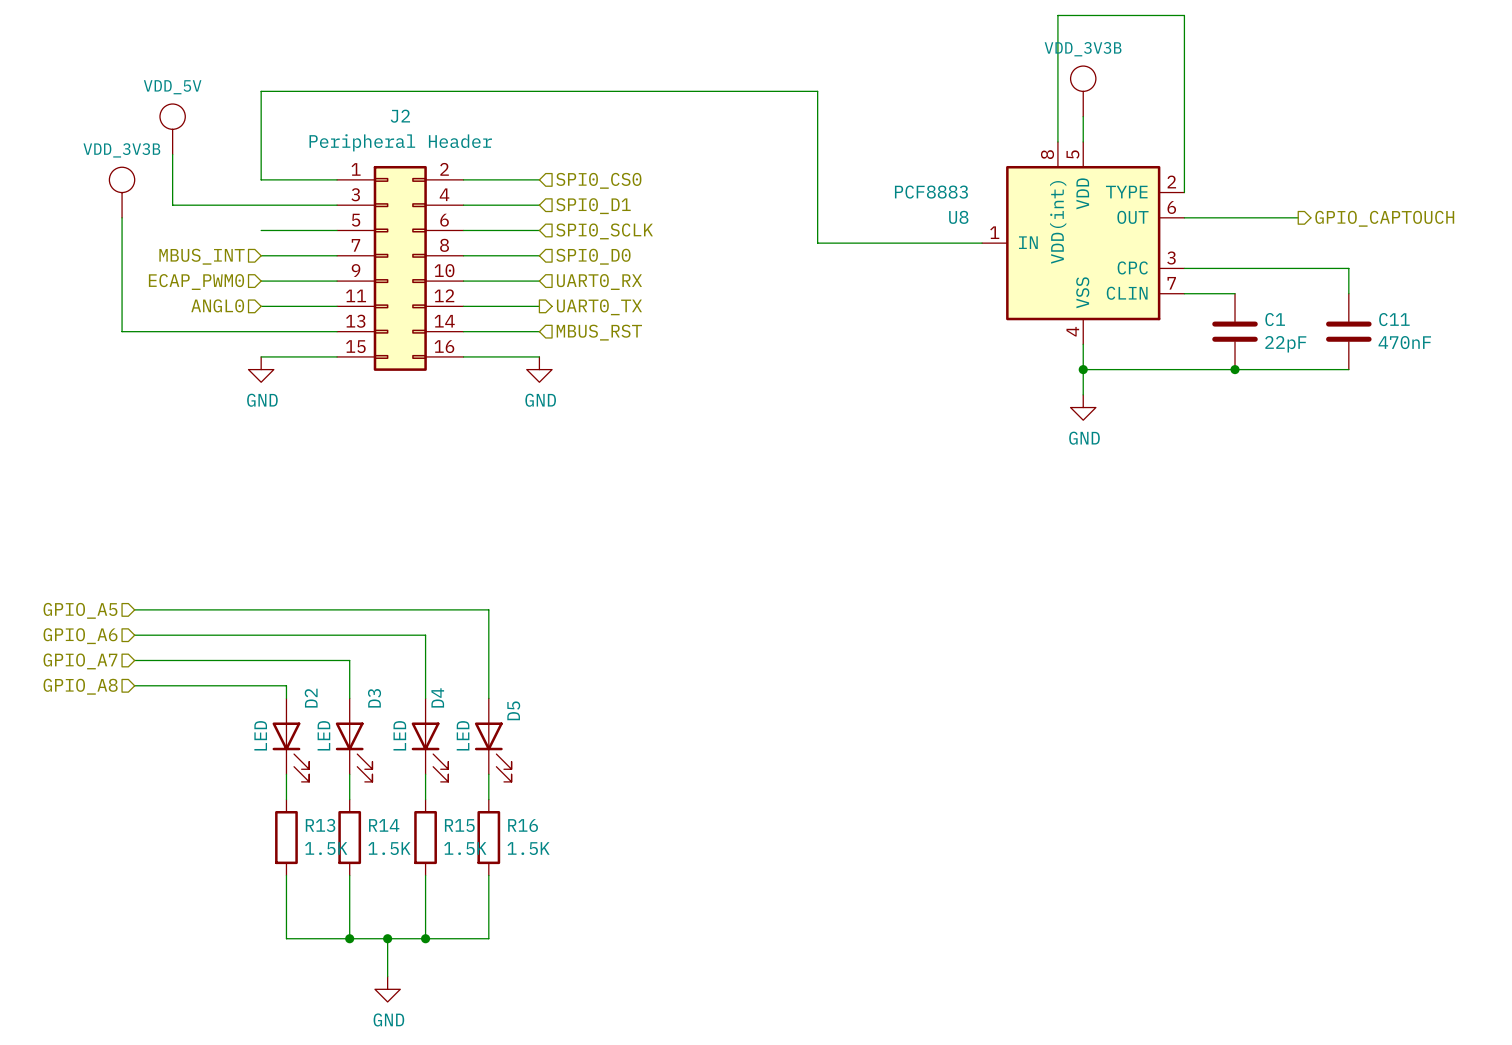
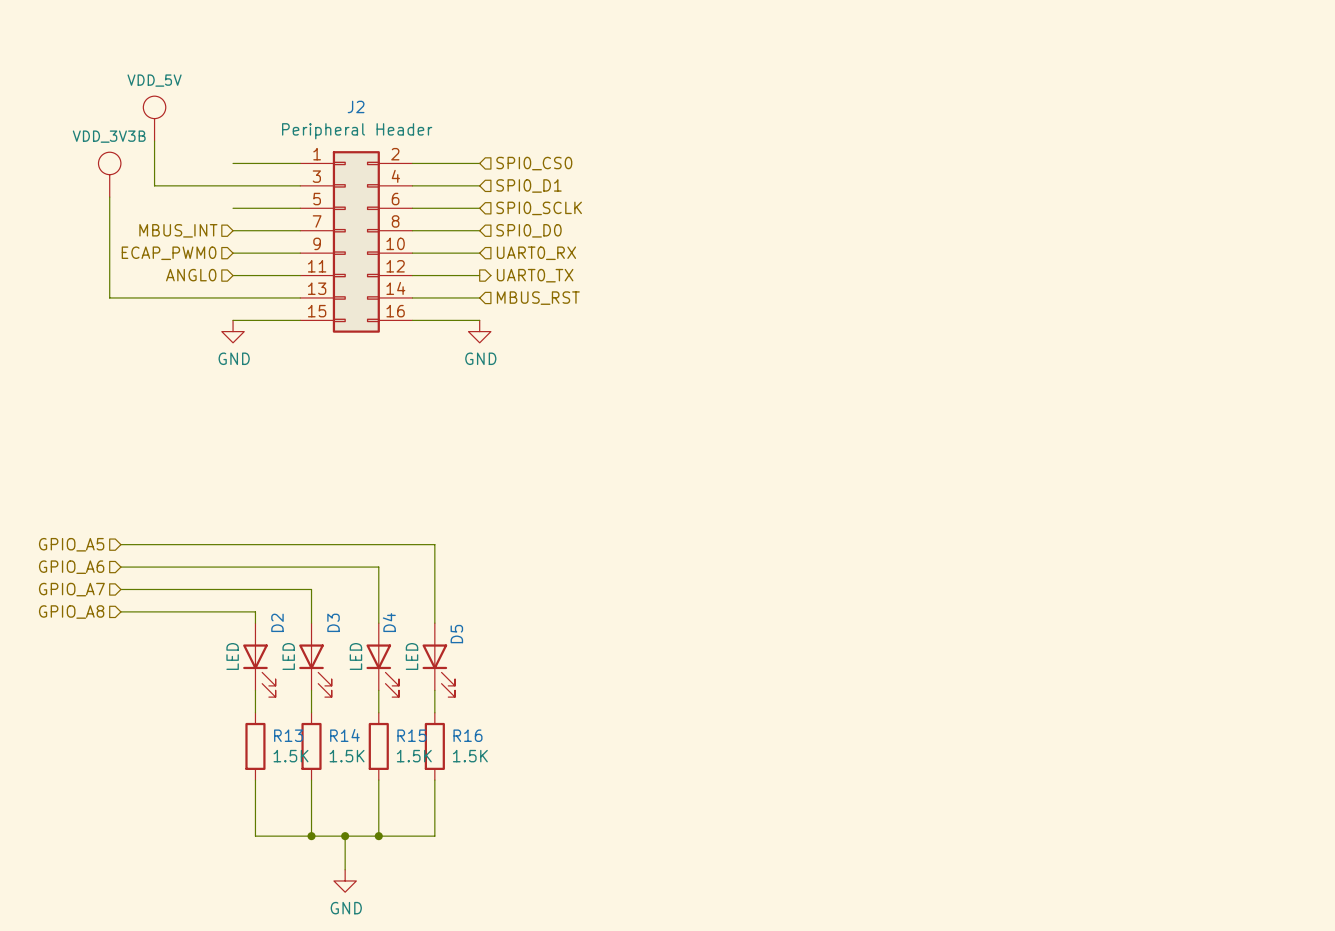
power symbol: VDD_3V3B (1083, 91) -> none
wire: (1083, 116) (1083, 141) -> none
wire: (1057, 141) (1057, 15) (1184, 15) (1184, 192) -> none
wire: (261, 179) (261, 91) (817, 91) (817, 243) (982, 243) -> none
wire: (1184, 217) (1298, 217) -> none
hierarchical label: GPIO_CAPTOUCH (1384, 218) -> none
U8: PCF8883 (1083, 243) -> none
wire: (1184, 268) (1348, 268) (1348, 293) -> none
wire: (1184, 293) (1235, 293) -> none
C1: 22pF (1235, 331) -> none
C11: 470nF (1348, 331) -> none
wire: (1083, 344) (1083, 394) -> none
wire: (1083, 369) (1348, 369) -> none
junction: (1083, 369) -> none
junction: (1235, 369) -> none
power symbol: GND (1083, 407) -> none

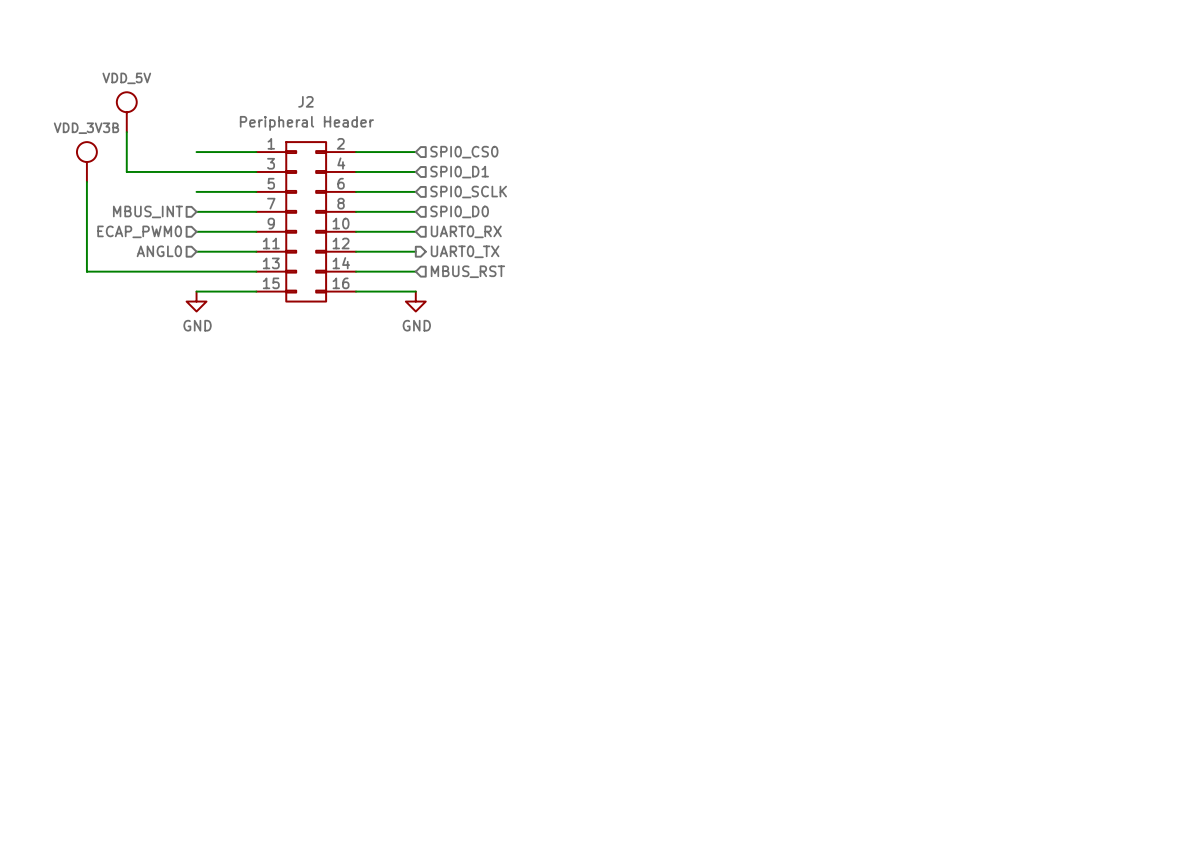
hierarchical label: GPIO_A5 (71, 544) -> none
wire: (120, 544) (434, 544) (434, 623) -> none
hierarchical label: GPIO_A6 (71, 567) -> none
wire: (120, 567) (378, 567) (378, 623) -> none
hierarchical label: GPIO_A7 (71, 589) -> none
wire: (120, 589) (311, 589) (311, 623) -> none
wire: (120, 611) (255, 611) (255, 623) -> none
hierarchical label: GPIO_A8 (71, 612) -> none
D2: LED (259, 660) -> none
D3: LED (315, 660) -> none
D4: LED (382, 660) -> none
D5: LED (438, 660) -> none
wire: (255, 690) (255, 712) -> none
wire: (311, 690) (311, 712) -> none
wire: (378, 690) (378, 712) -> none
wire: (434, 690) (434, 712) -> none
R13: 1.5K (255, 746) -> none
R14: 1.5K (311, 746) -> none
R15: 1.5K (378, 746) -> none
R16: 1.5K (434, 746) -> none
wire: (255, 780) (255, 836) (434, 836) (434, 780) -> none
wire: (311, 780) (311, 836) -> none
wire: (378, 780) (378, 836) -> none
junction: (311, 836) -> none
wire: (345, 836) (345, 869) -> none
junction: (345, 836) -> none
junction: (378, 836) -> none
power symbol: GND (345, 880) -> none

